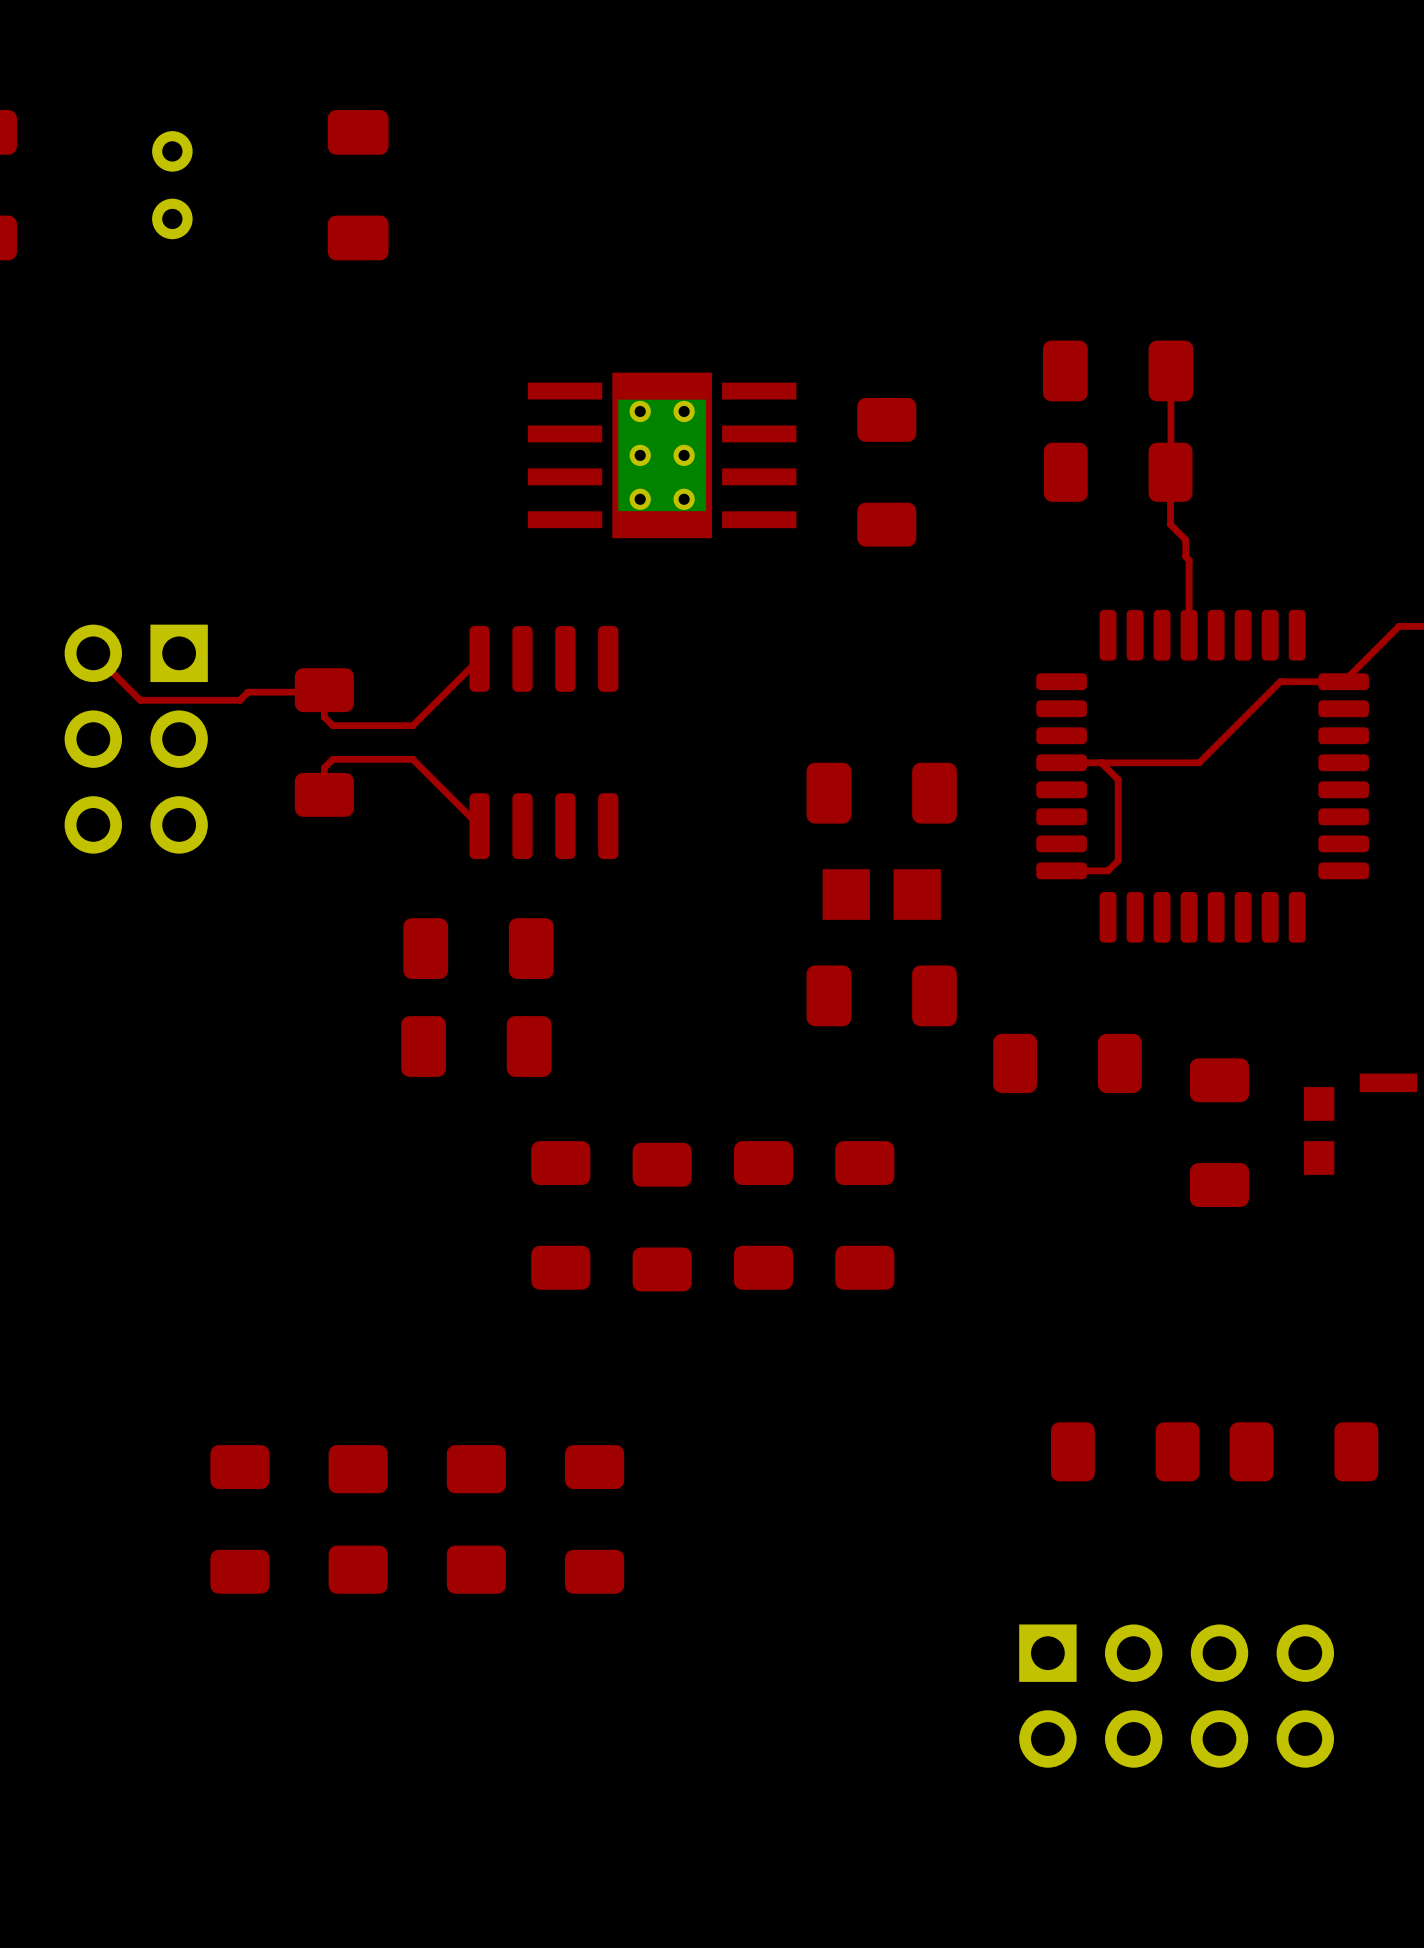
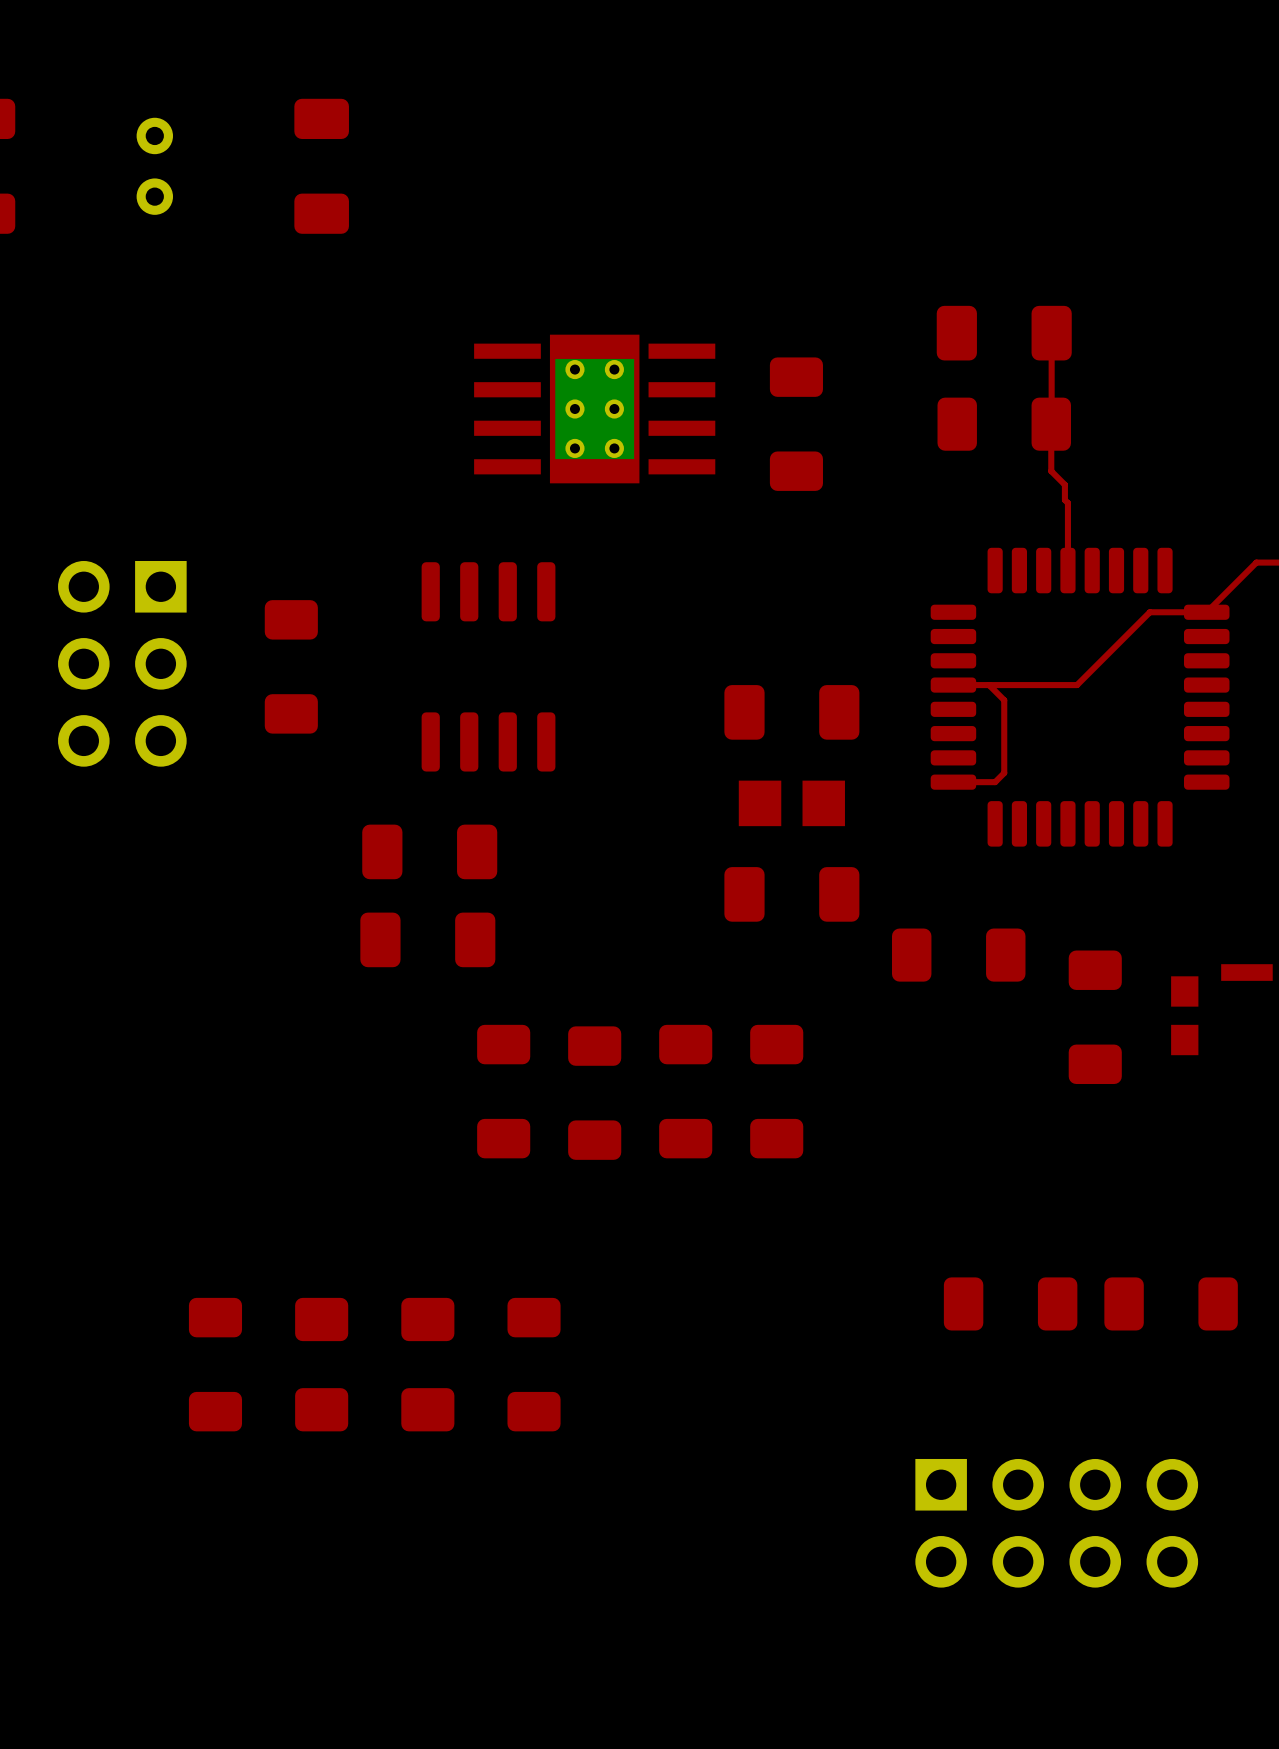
top track: (93, 653) (140, 700) (239, 700) (248, 692) (322, 692) (324, 690) (324, 717) (332, 725) (412, 725) (479, 658) -> none
top track: (324, 794) (324, 767) (332, 759) (412, 759) (479, 826) -> none

